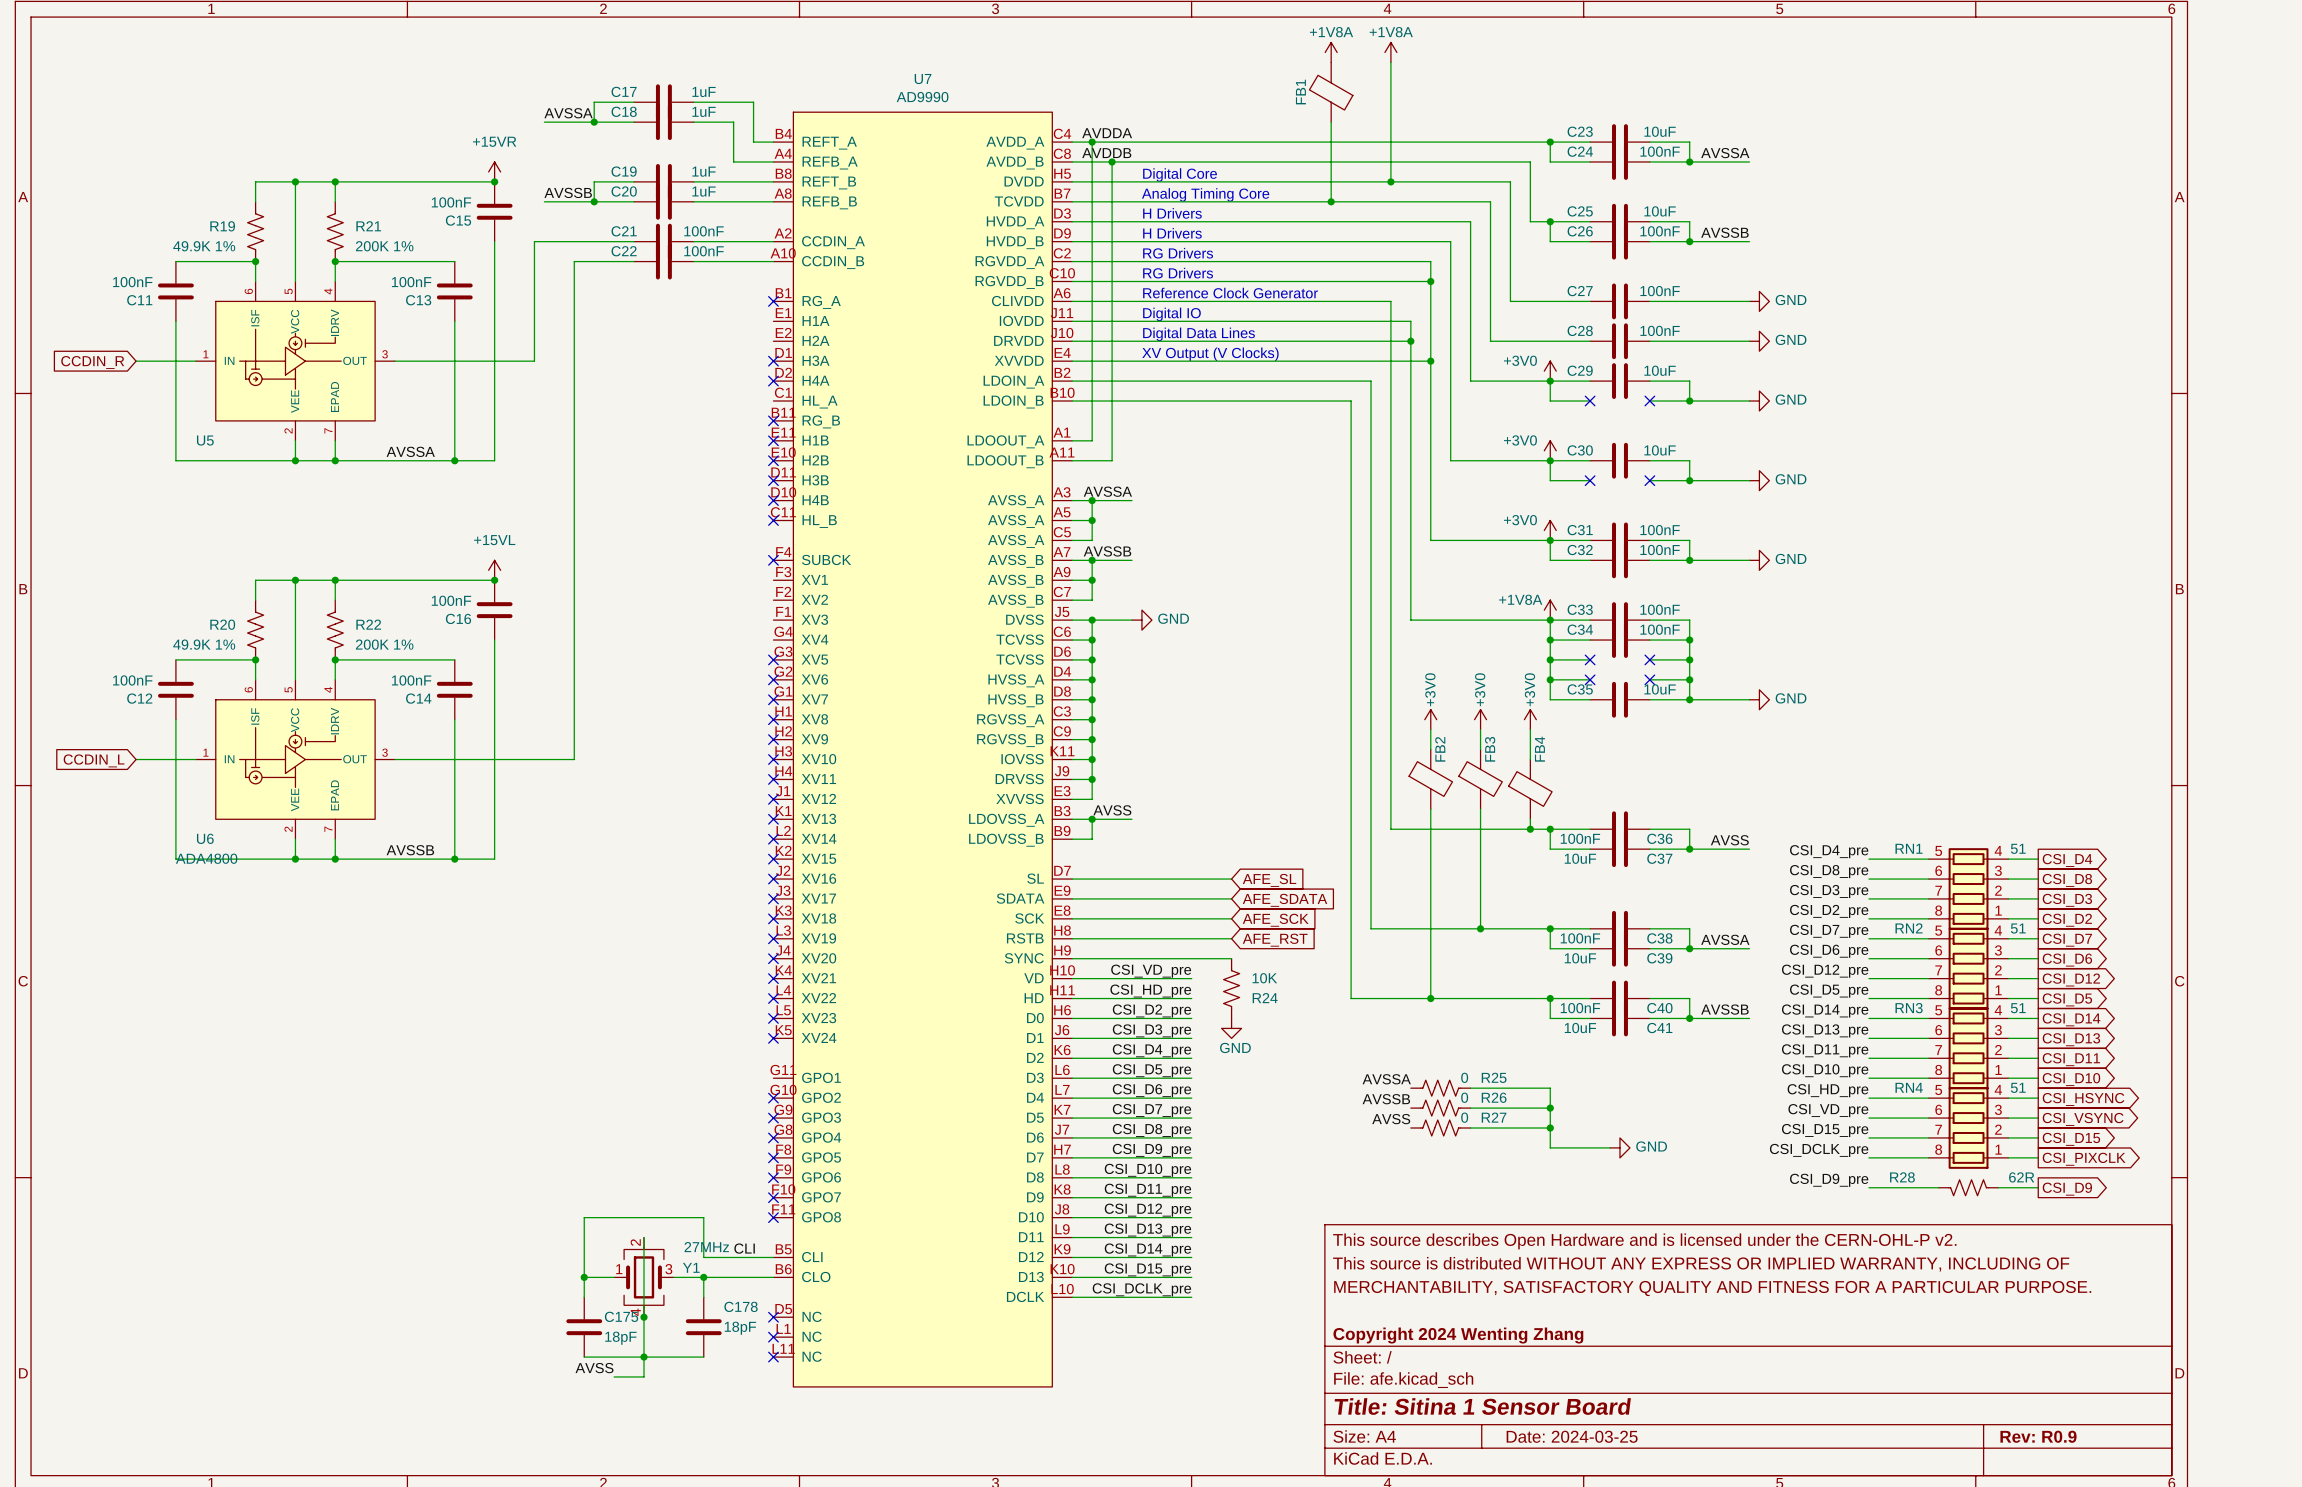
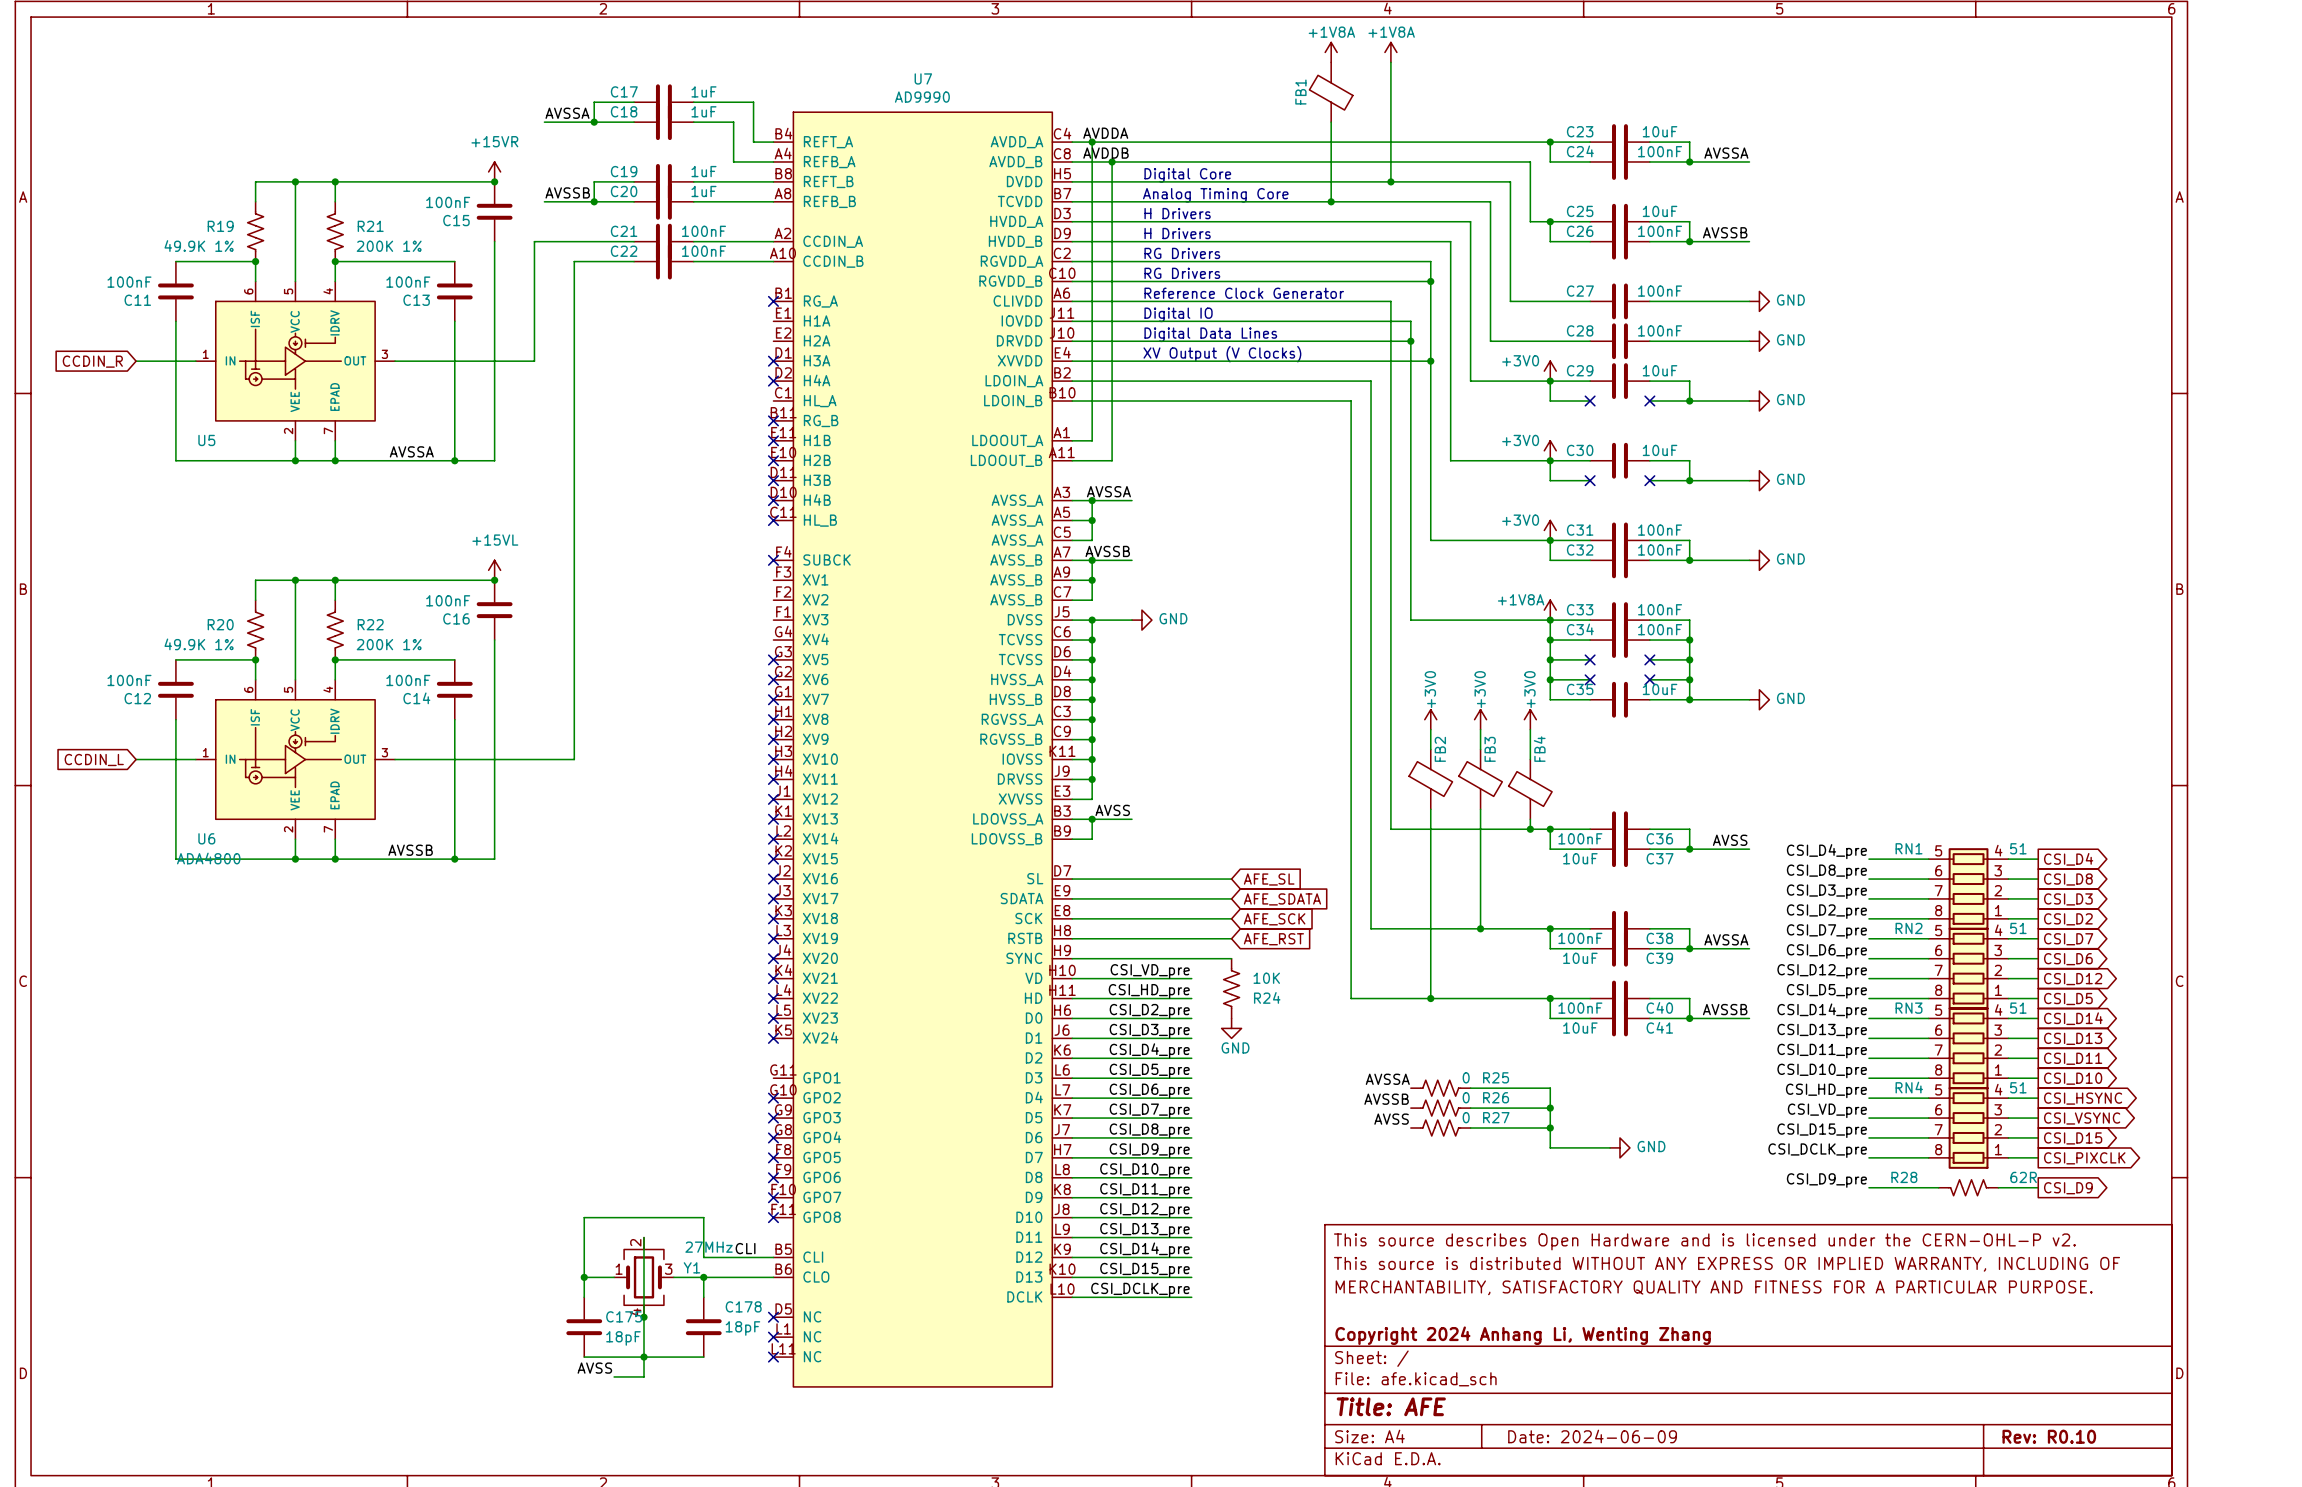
title block: Copyright 2024 Wenting Zhang (1458, 1335) -> Copyright 2024 Anhang Li, Wenting Zhang (1523, 1335)
title block: Title: Sitina 1 Sensor Board (1482, 1406) -> Title: AFE (1391, 1406)
title block: Date: 2024-03-25 (1572, 1436) -> Date: 2024-06-09 (1592, 1436)
title block: Rev: R0.9 (2038, 1436) -> Rev: R0.10 (2049, 1436)

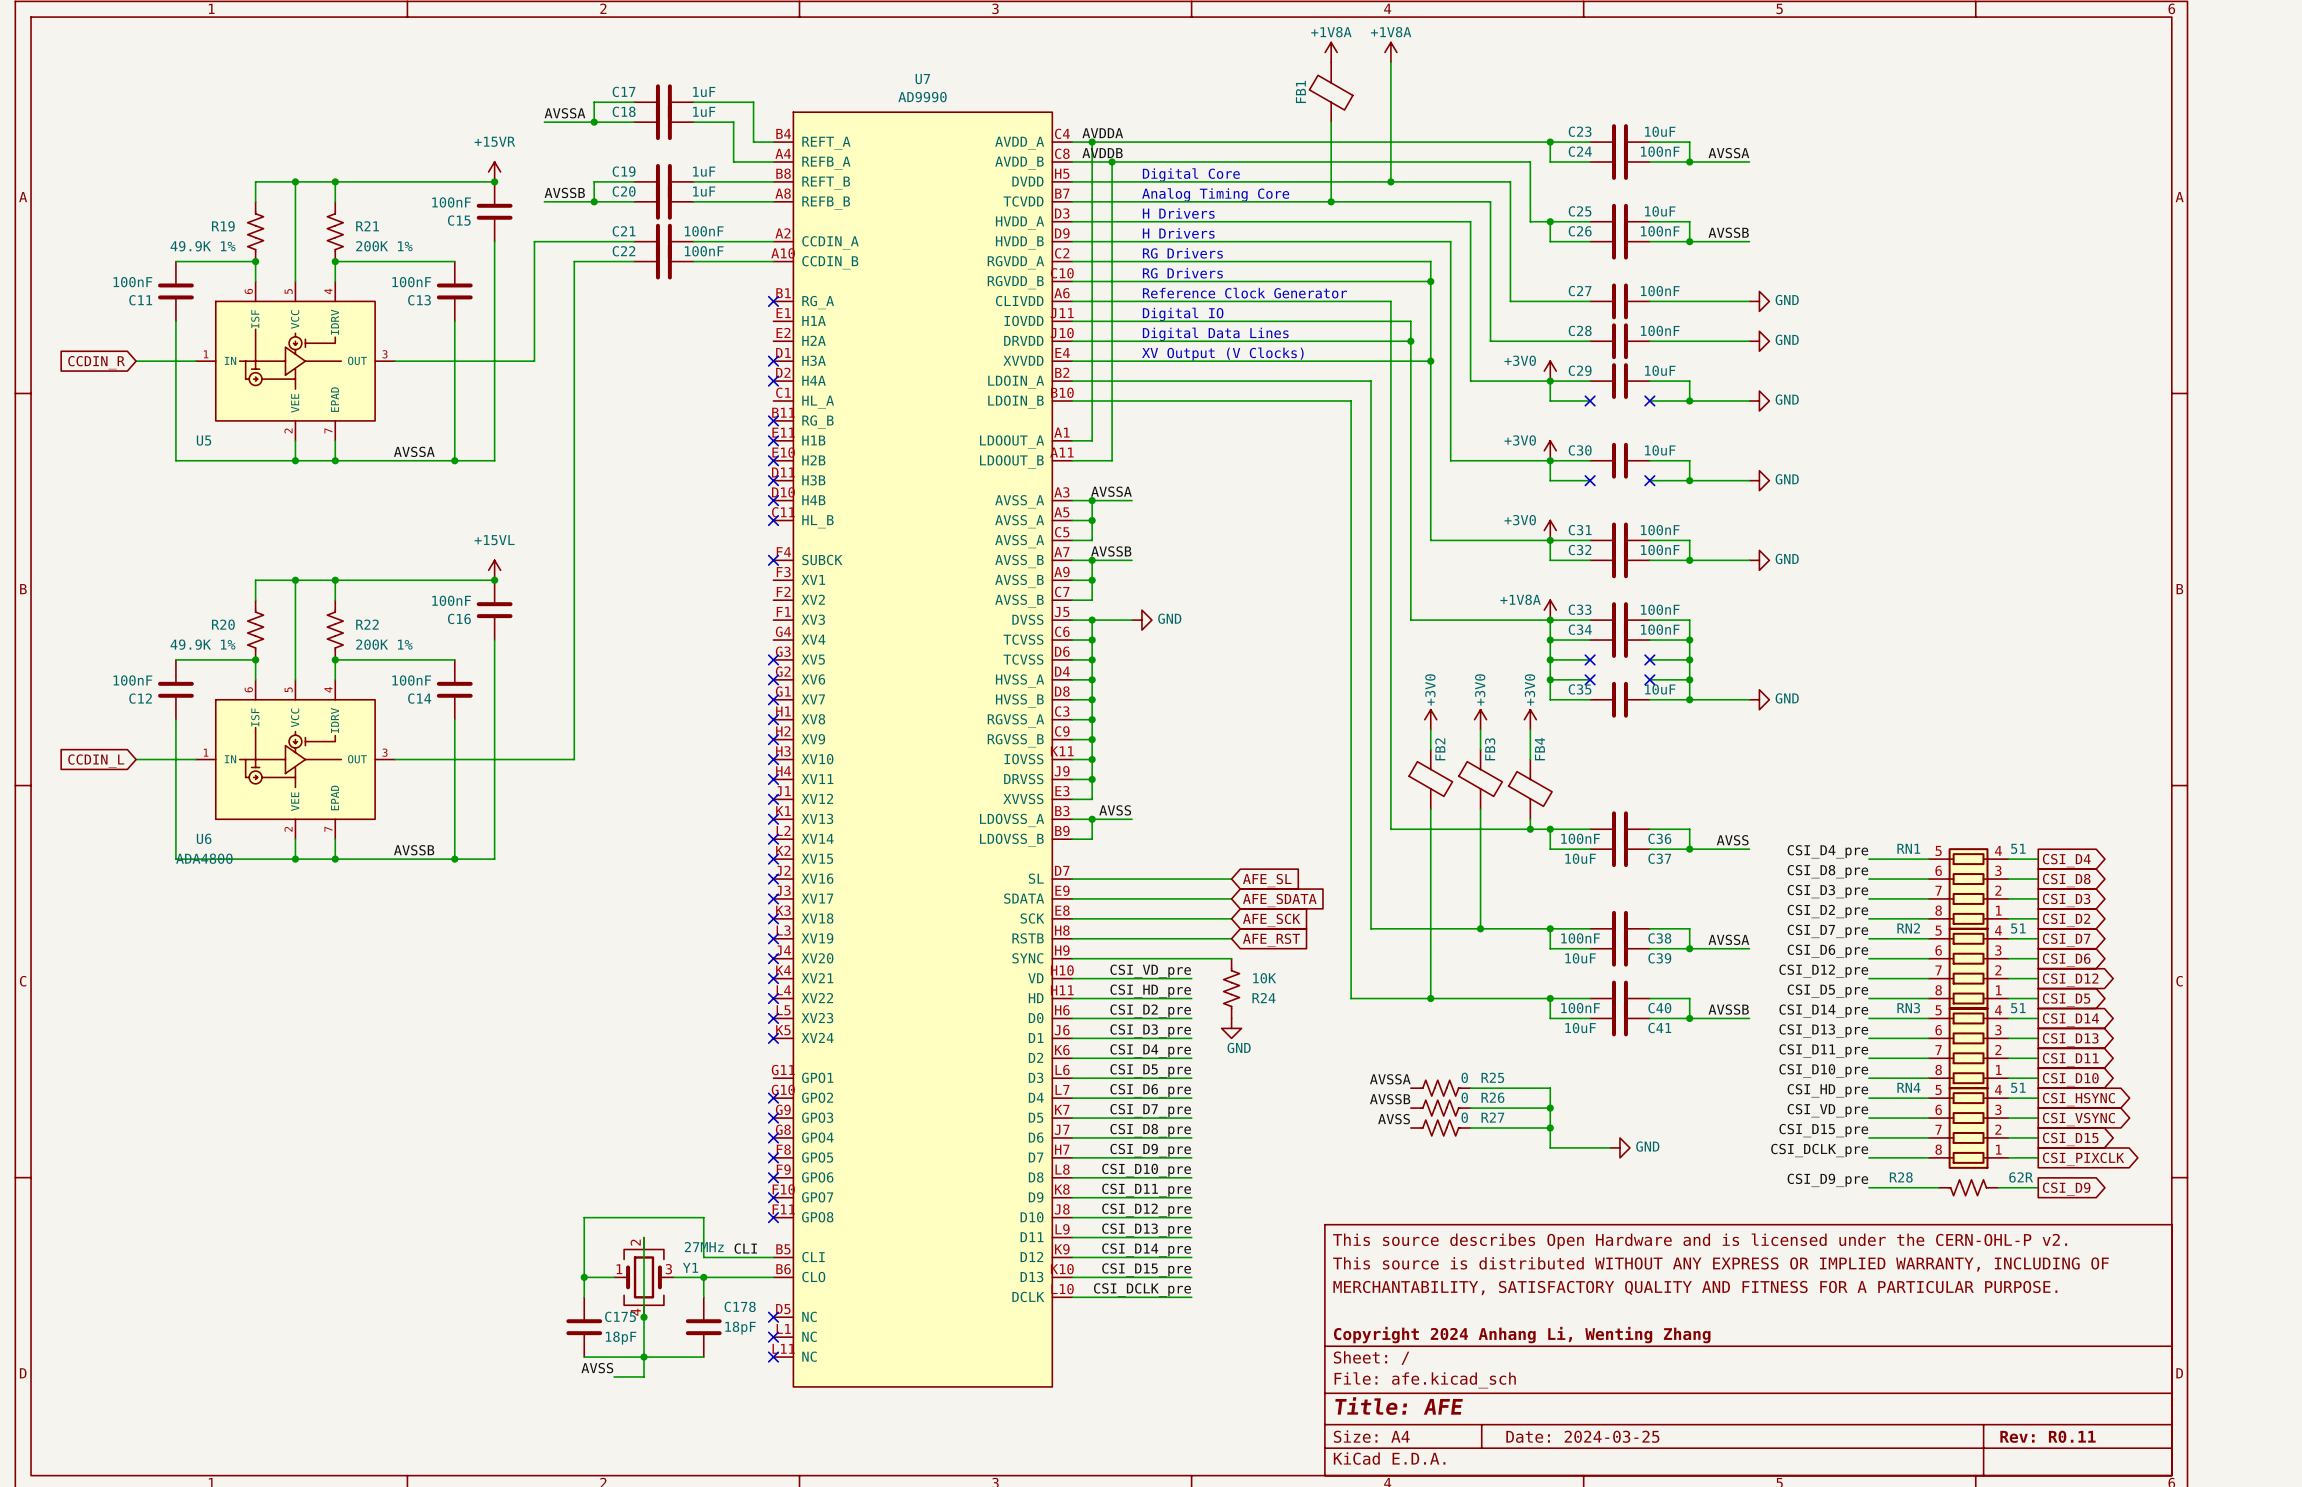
title block: Date: 2024-06-09 (1592, 1436) -> Date: 2024-03-25 (1582, 1436)
title block: Rev: R0.10 (2049, 1436) -> Rev: R0.11 (2047, 1436)

